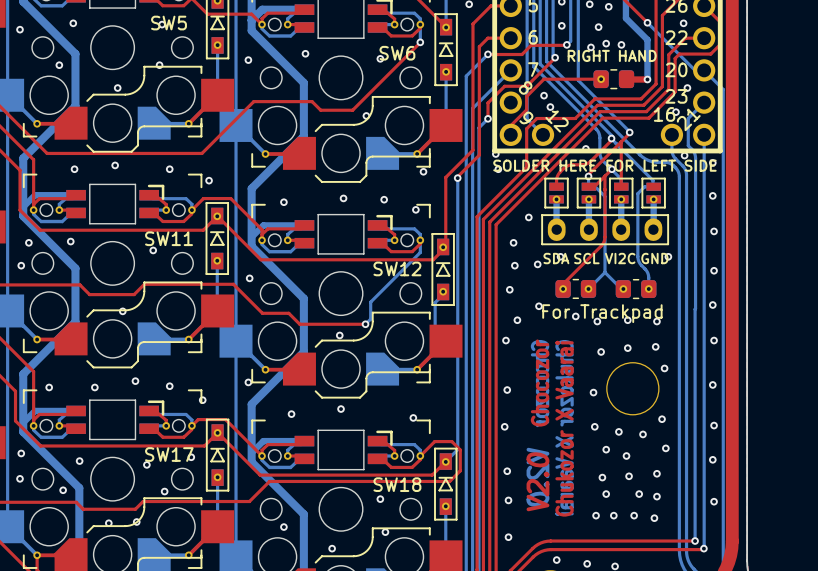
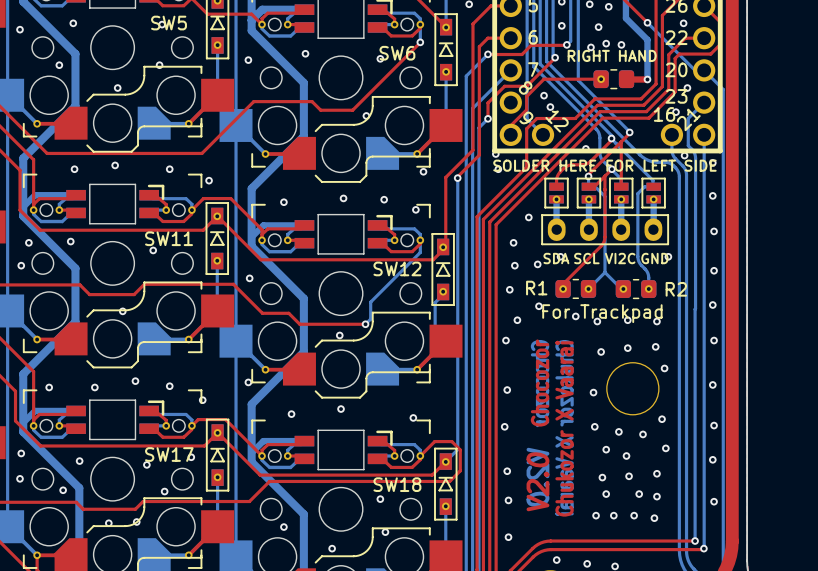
text: none -> R1 (536, 288)
text: none -> R2 (676, 289)

